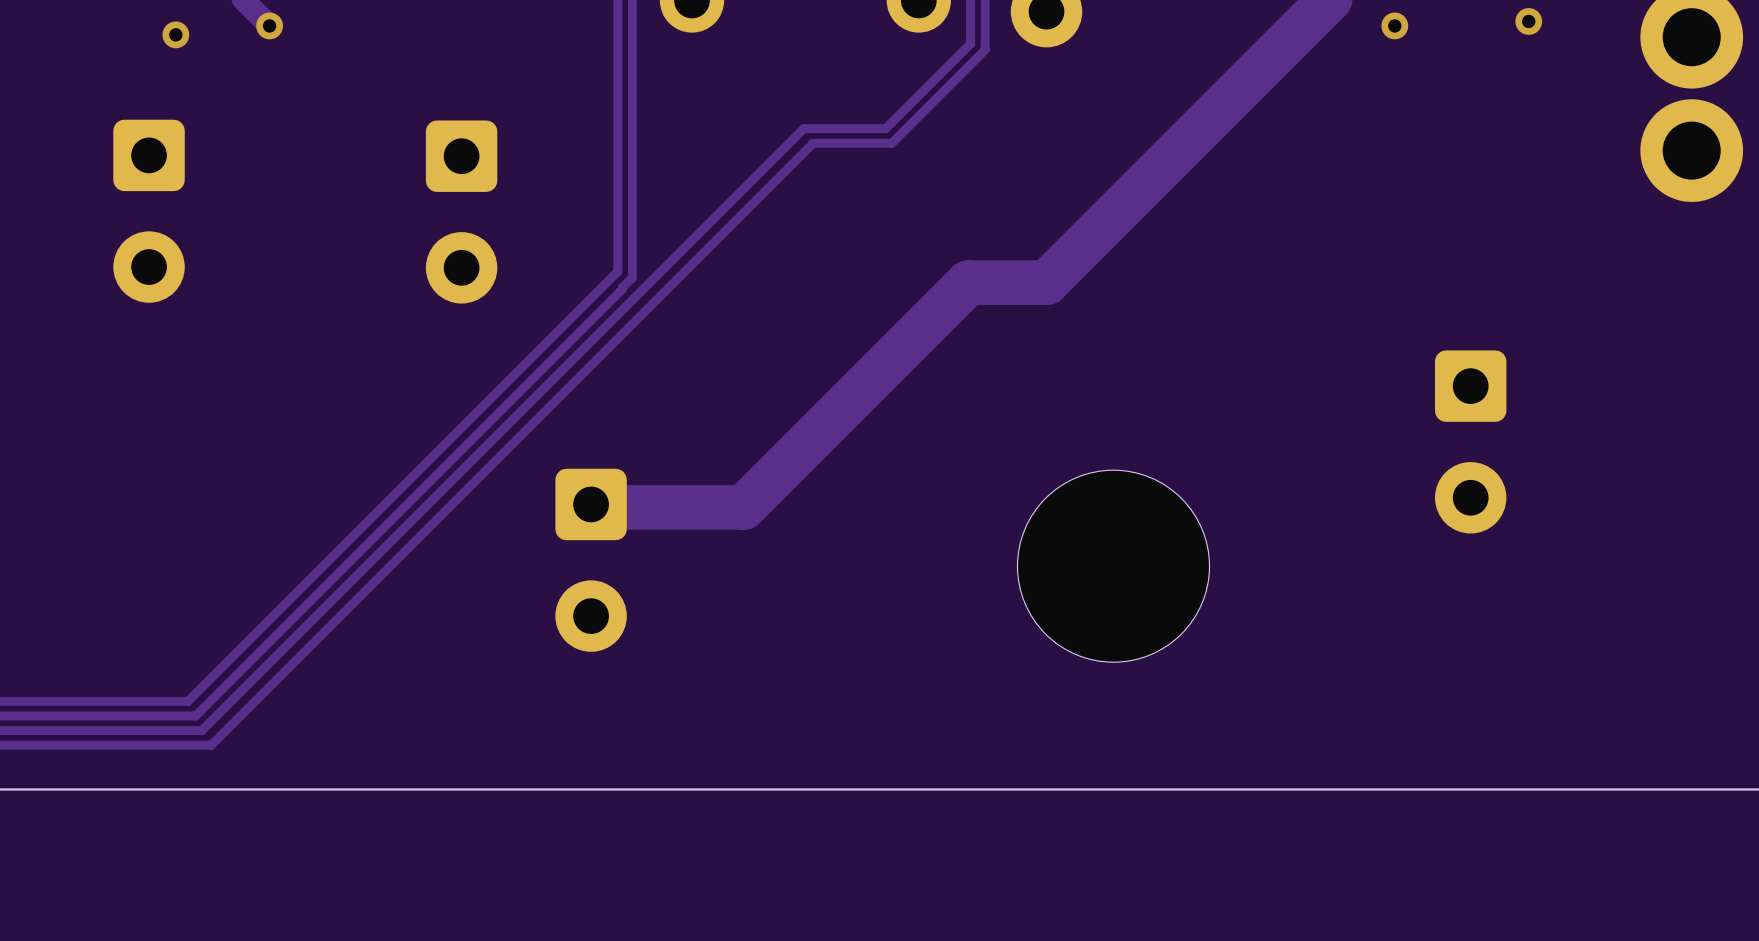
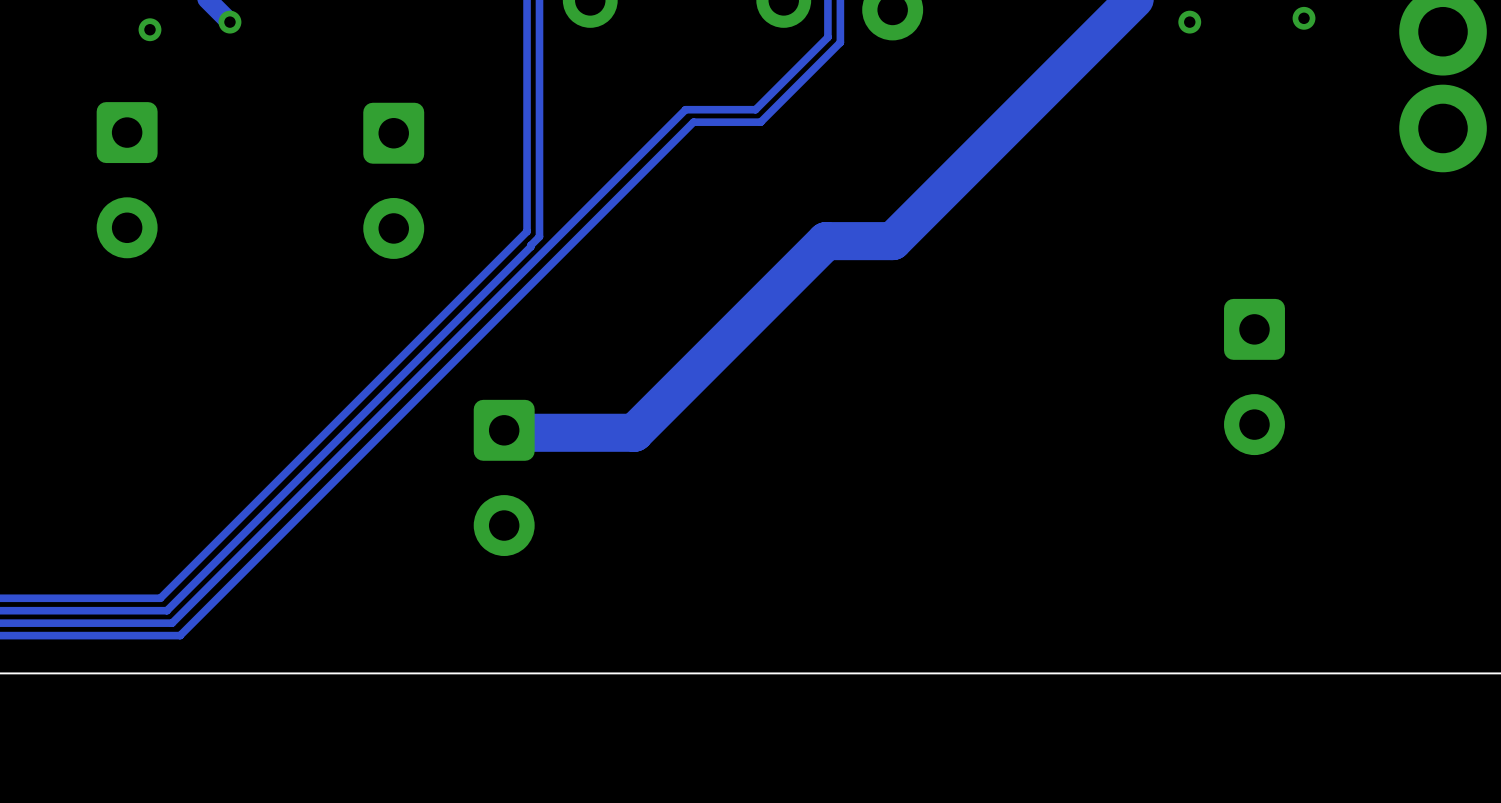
part: (1113, 566) -> none

